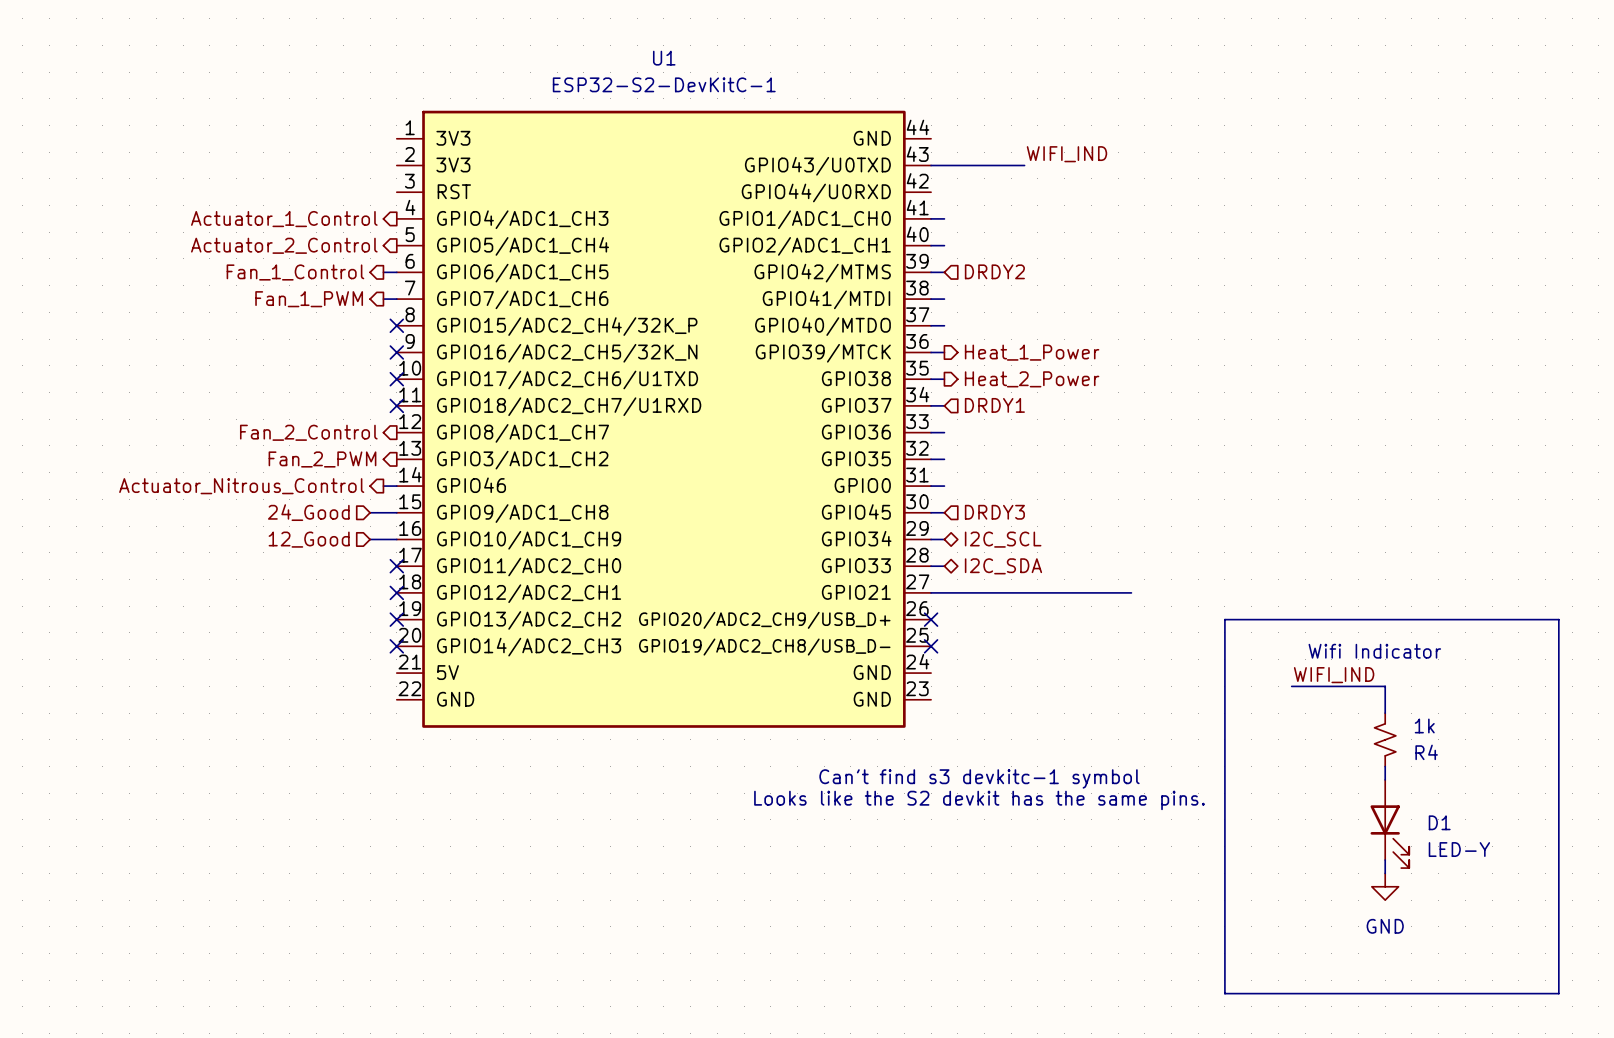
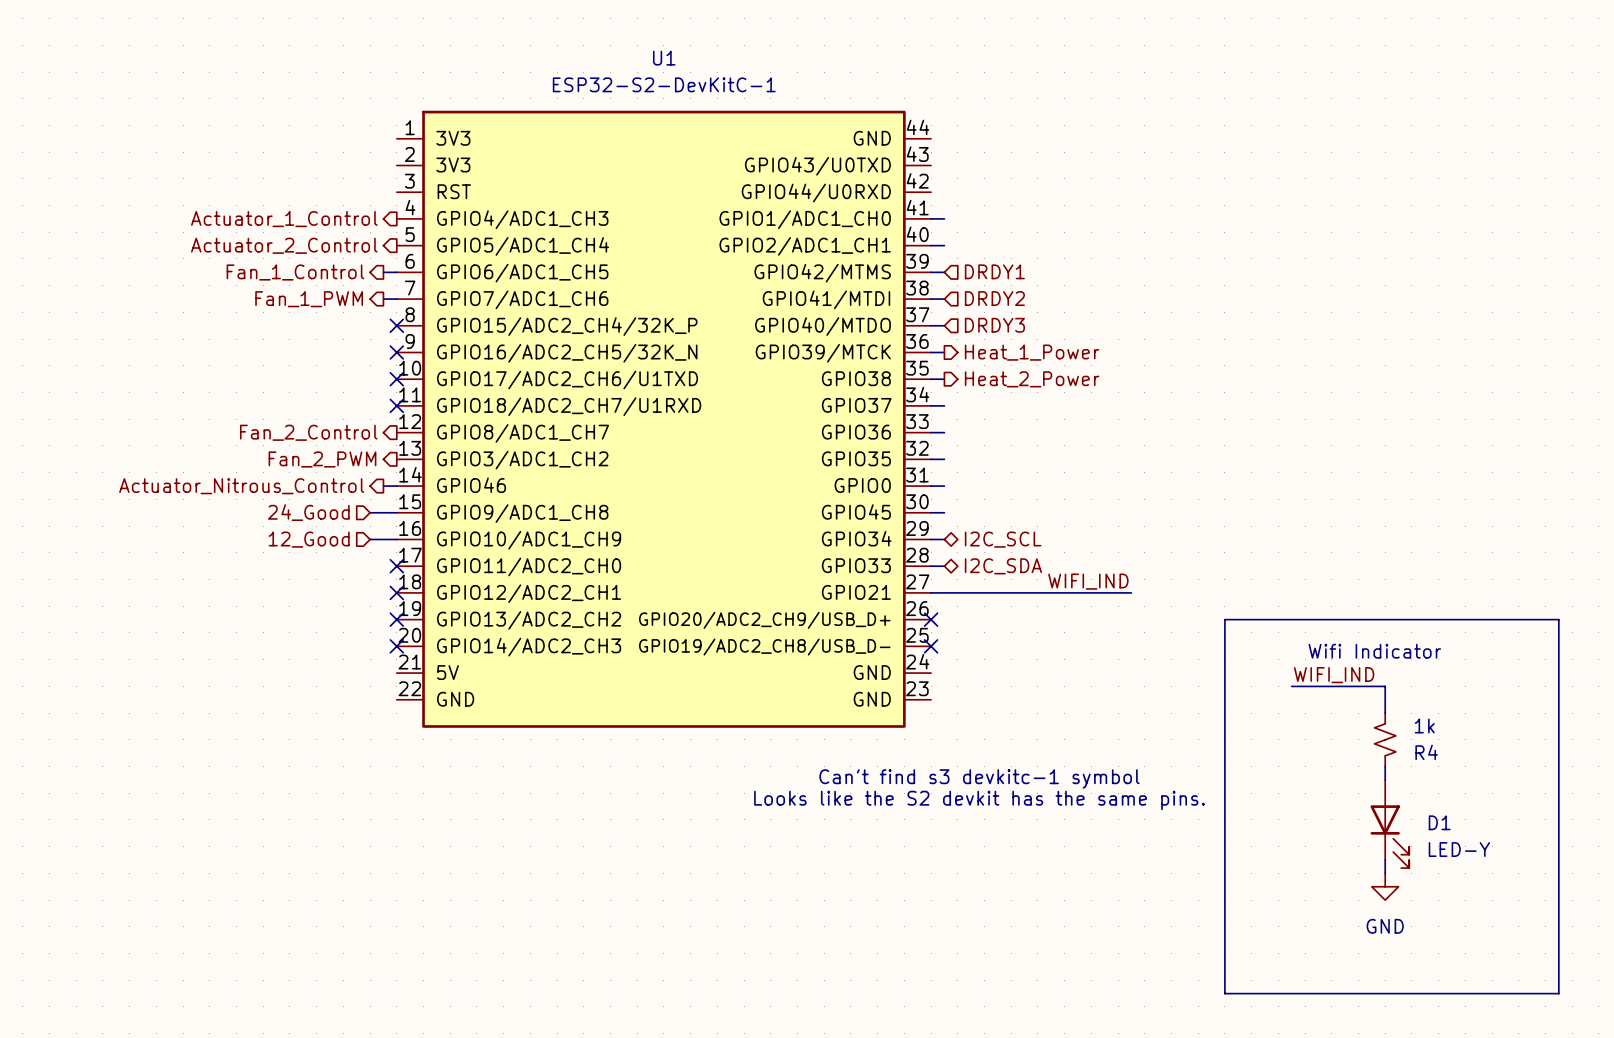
label: WIFI_IND (1066, 154) -> none
wire: (931, 165) (1024, 165) -> none
hierarchical label: DRDY2 (994, 271) -> DRDY1 (994, 271)
hierarchical label: none -> DRDY2 (994, 298)
hierarchical label: DRDY1 (994, 405) -> none
hierarchical label position: DRDY3 (994, 512) -> DRDY3 (994, 325)
label: none -> WIFI_IND (1088, 581)

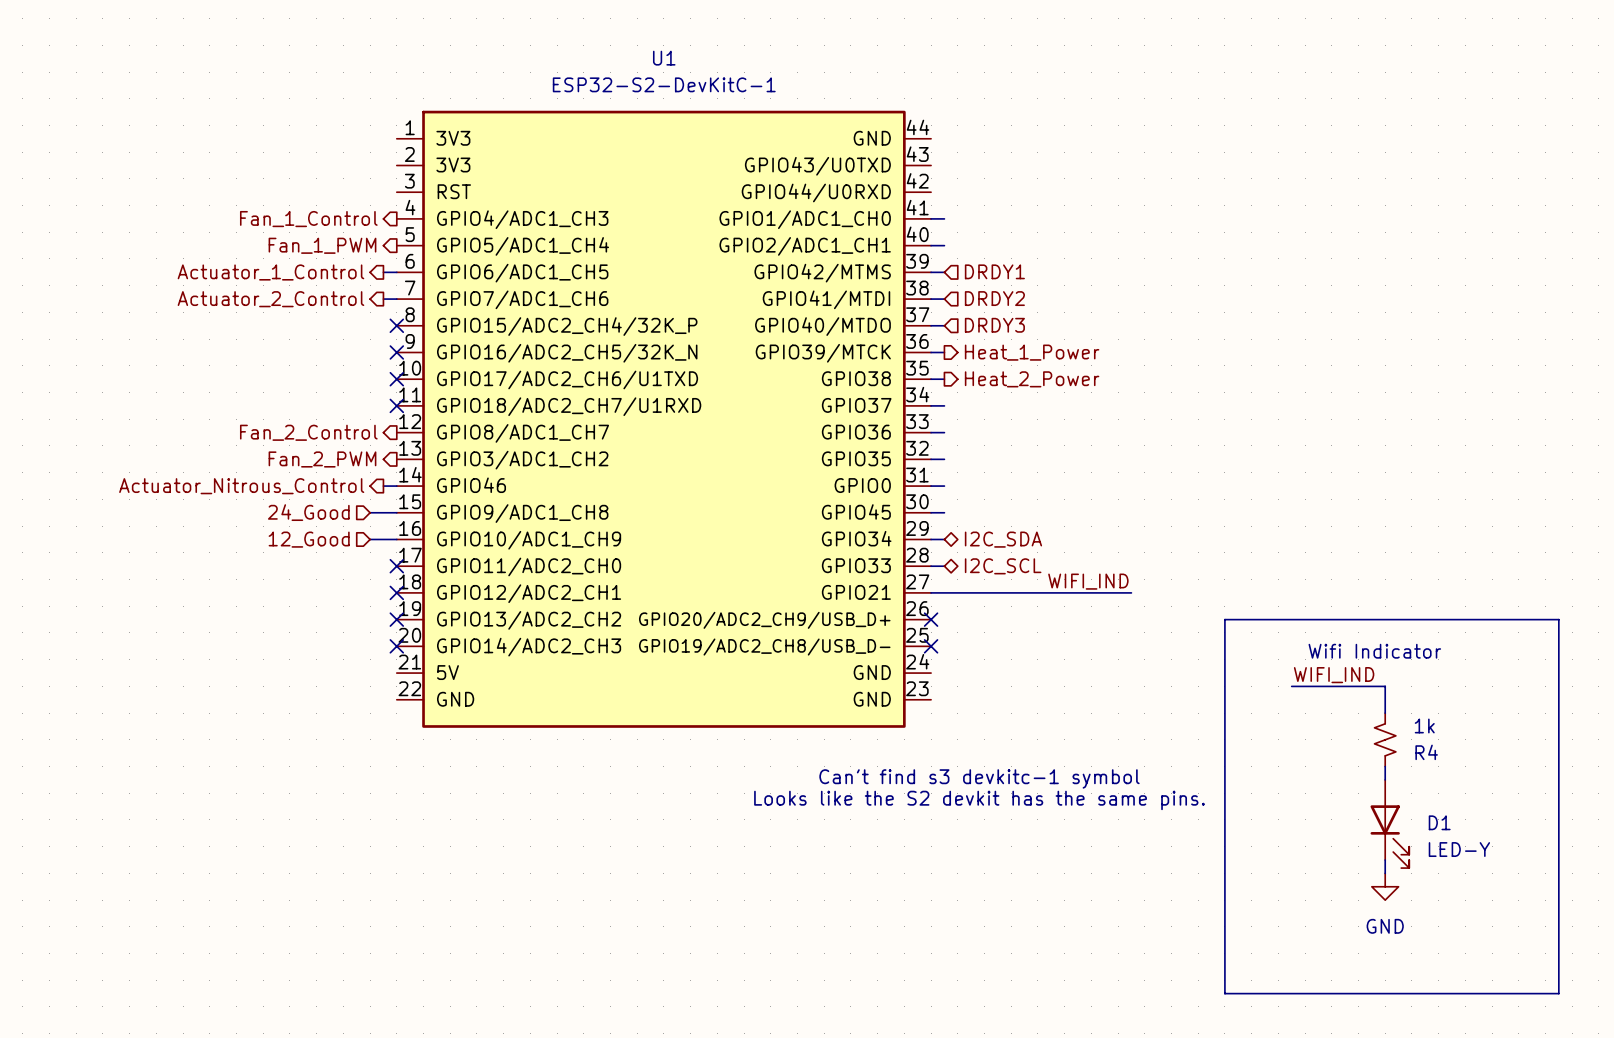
hierarchical label: Actuator_1_Control (284, 219) -> Fan_1_Control (308, 219)
hierarchical label: Actuator_2_Control (284, 245) -> Fan_1_PWM (322, 245)
hierarchical label: Fan_1_Control (295, 272) -> Actuator_1_Control (270, 272)
hierarchical label: Fan_1_PWM (309, 299) -> Actuator_2_Control (270, 299)
hierarchical label: I2C_SCL (1003, 539) -> I2C_SDA (1003, 539)
hierarchical label: I2C_SDA (1003, 566) -> I2C_SCL (1003, 566)

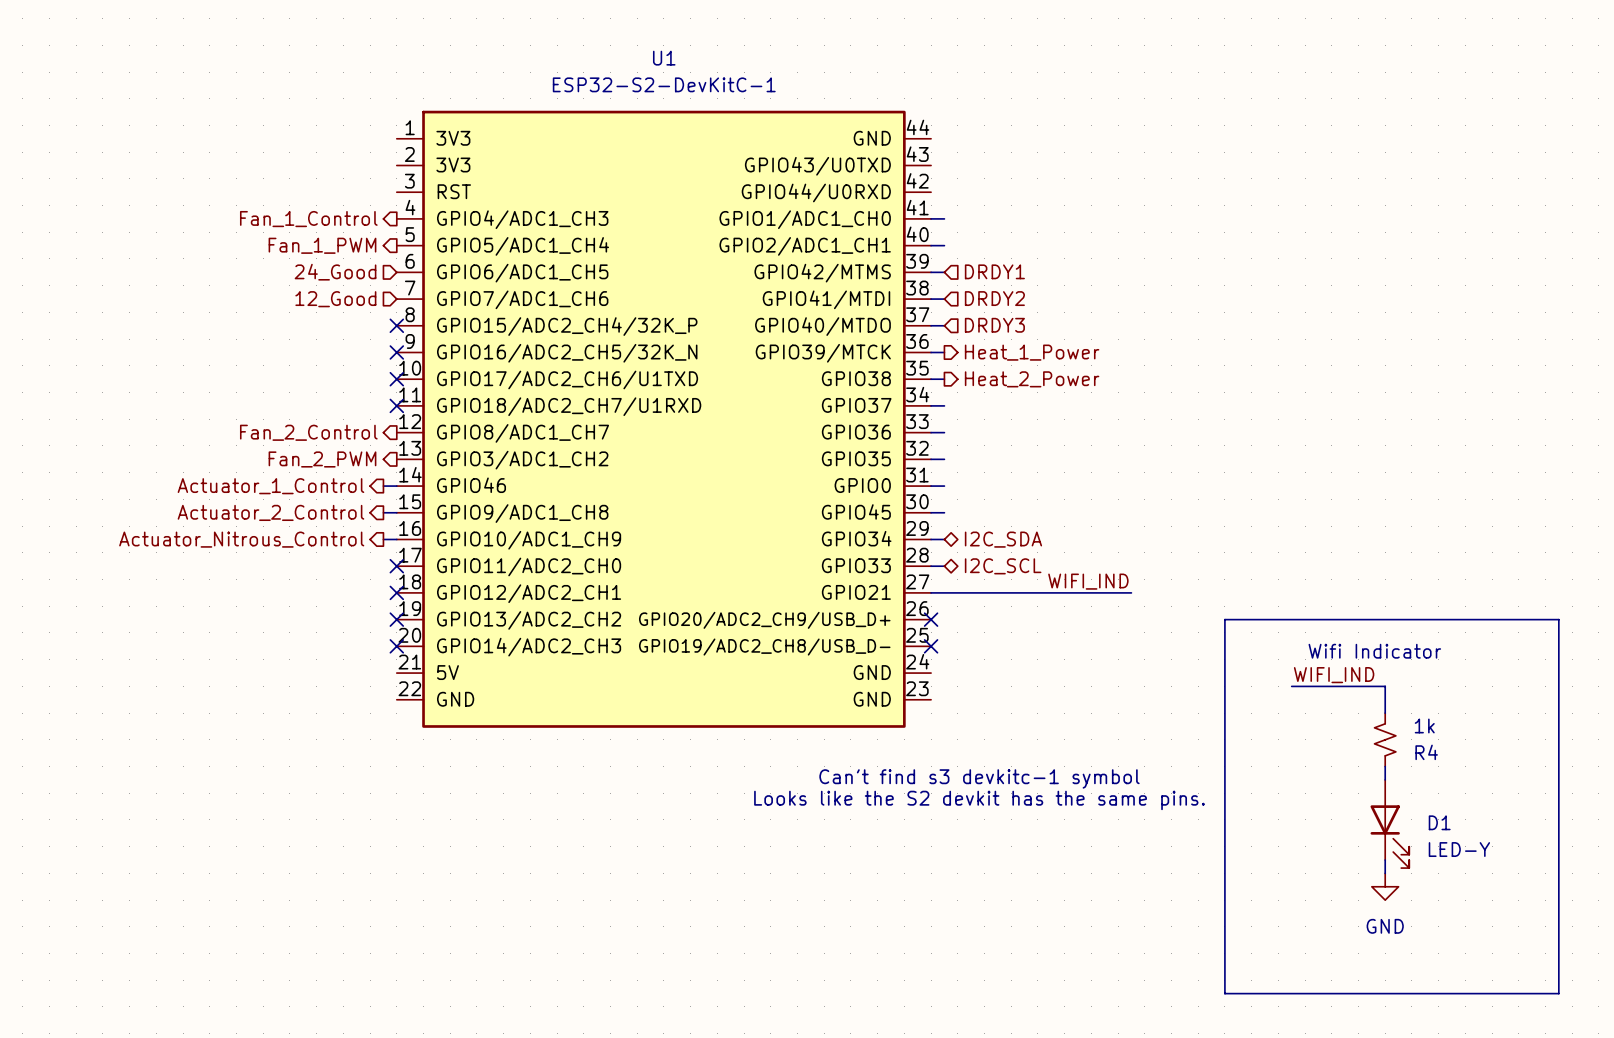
hierarchical label: Actuator_1_Control (270, 272) -> none
wire: (383, 272) (396, 272) -> none
hierarchical label position: Actuator_2_Control (270, 299) -> Actuator_2_Control (270, 512)
wire: (383, 299) (396, 299) -> none
hierarchical label: Actuator_Nitrous_Control (241, 486) -> Actuator_1_Control (270, 486)
hierarchical label position: 24_Good (308, 512) -> 24_Good (335, 272)
wire: (370, 512) (383, 512) -> none
hierarchical label: none -> Actuator_Nitrous_Control (241, 539)
hierarchical label position: 12_Good (309, 539) -> 12_Good (335, 299)
wire: (370, 539) (383, 539) -> none

